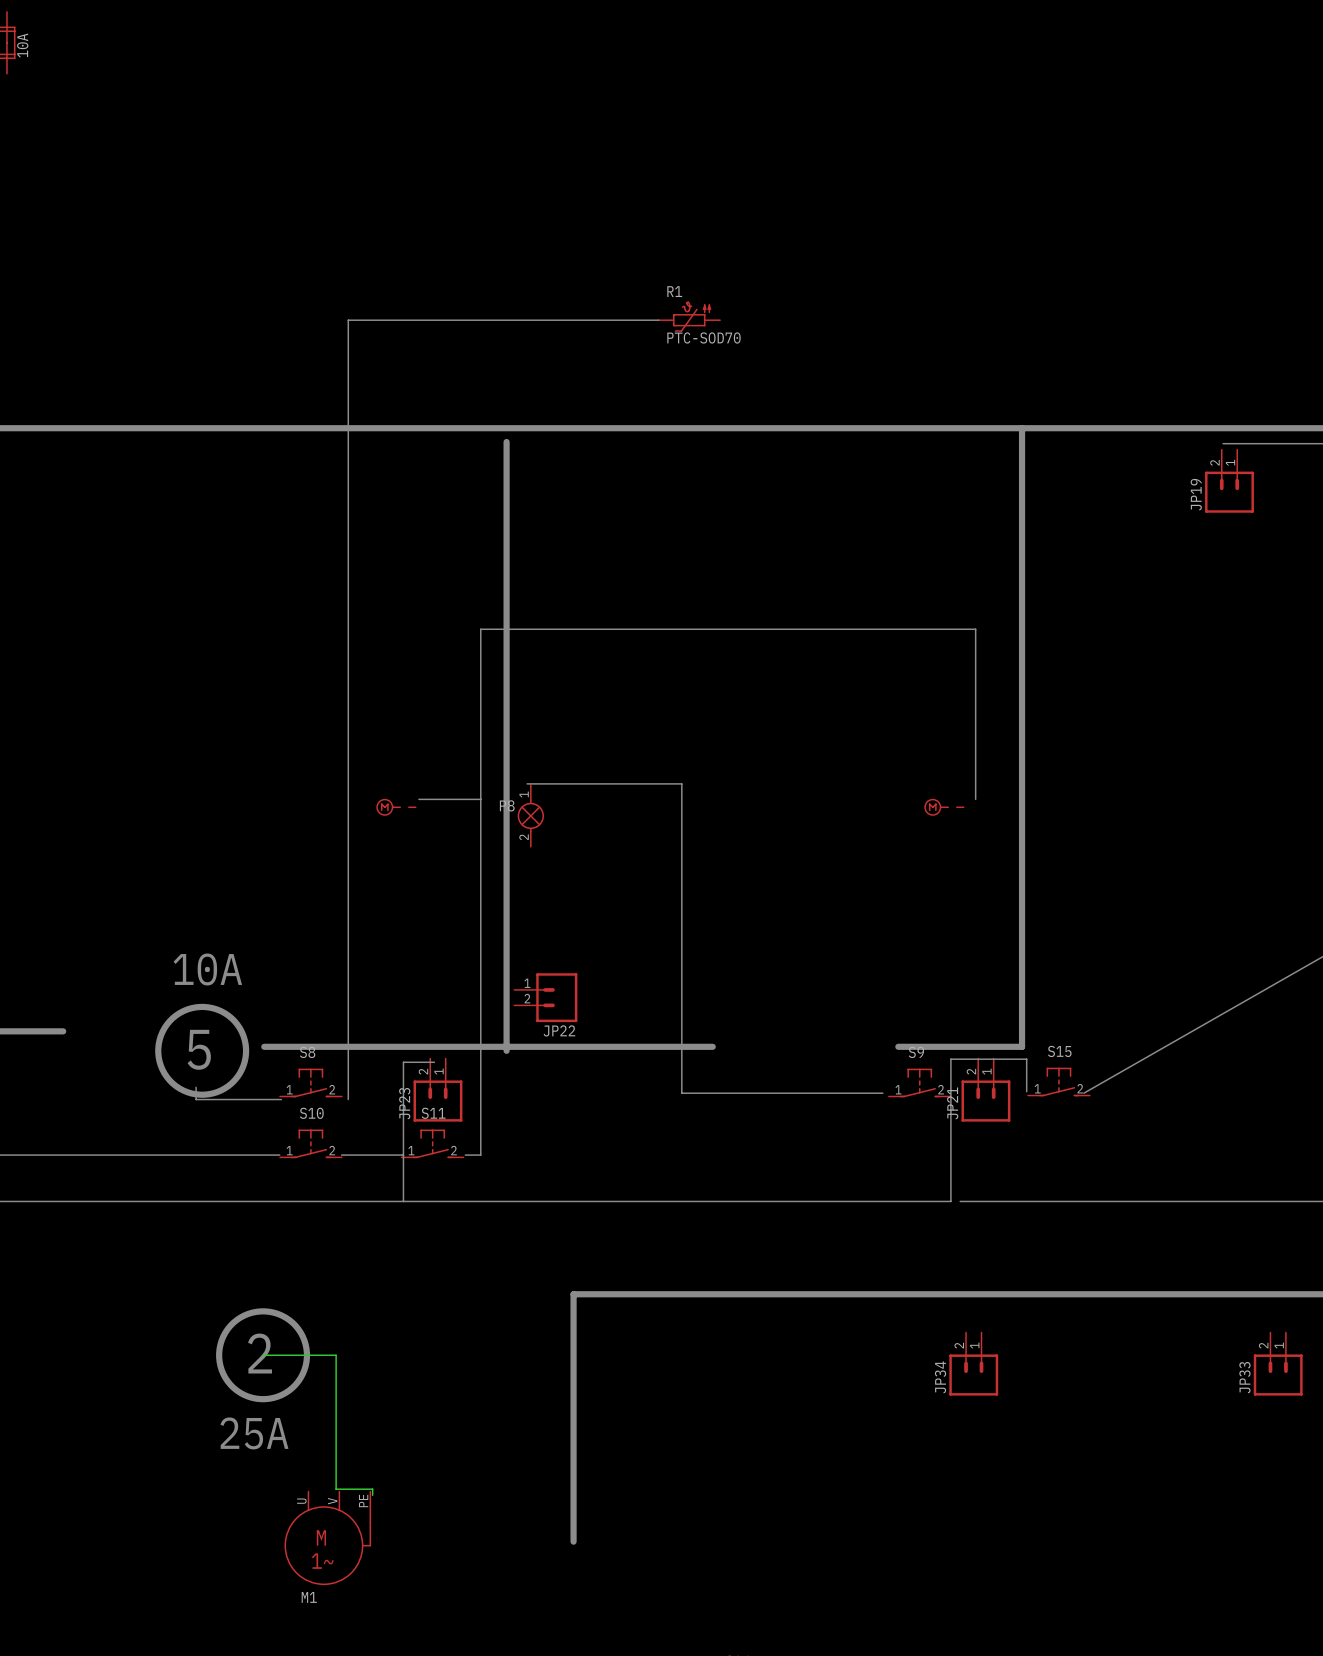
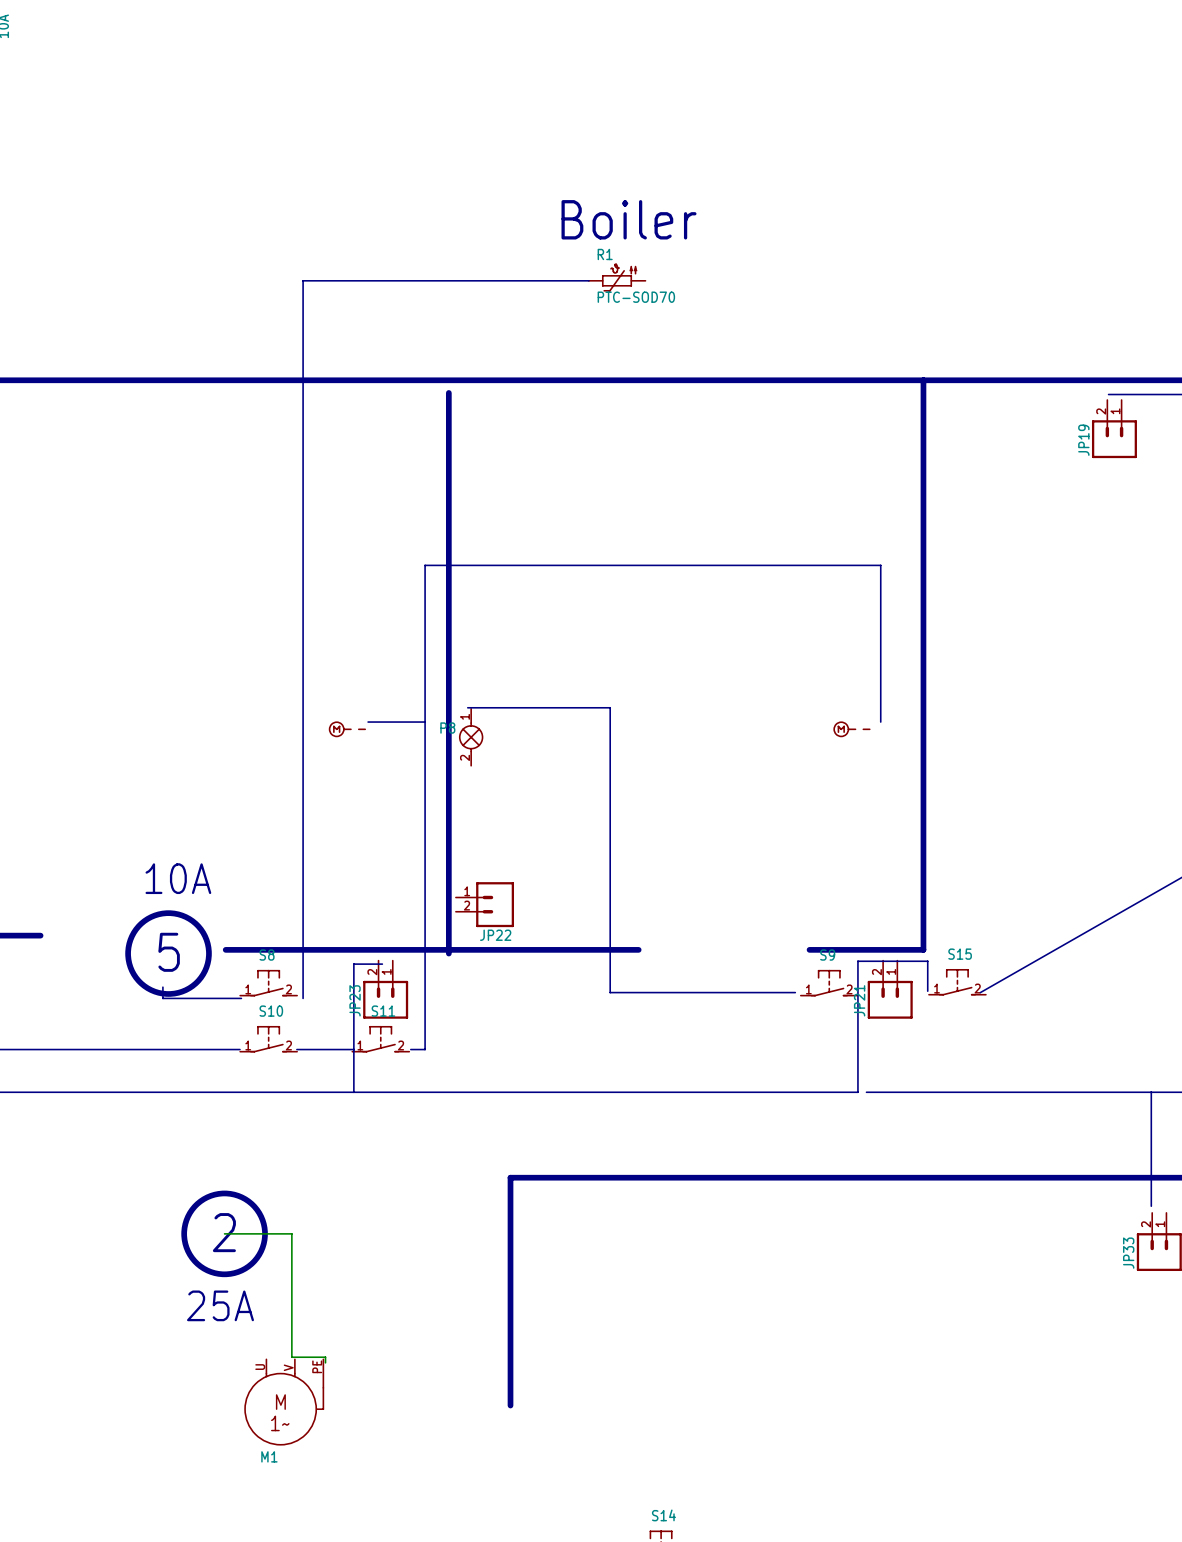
text: none -> Boiler (629, 219)
bus: none -> (1151, 1092) (1151, 1206)
JP34: (973, 1364) -> none

